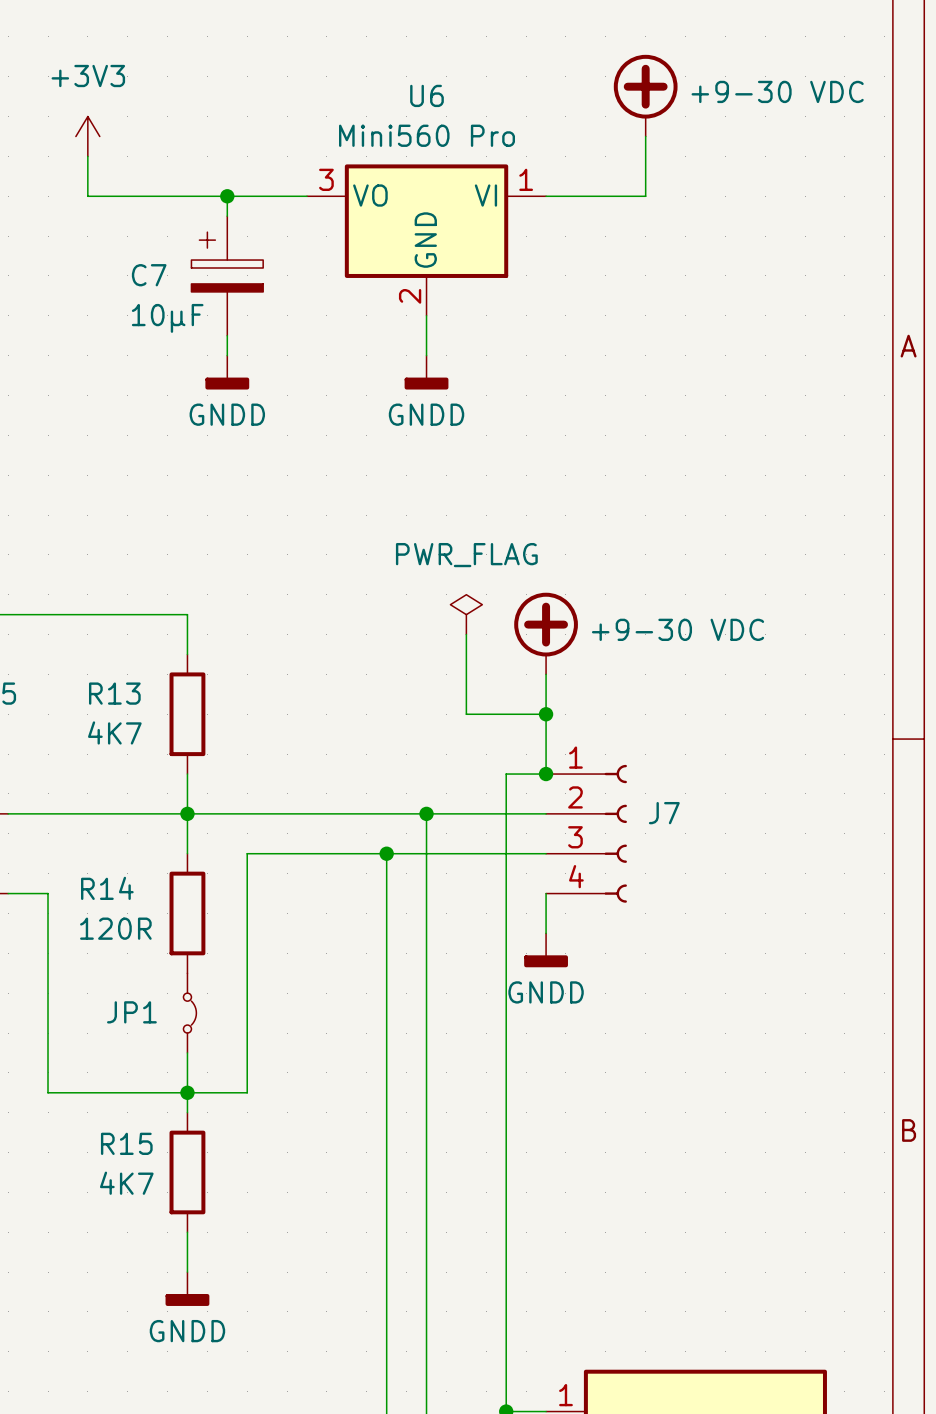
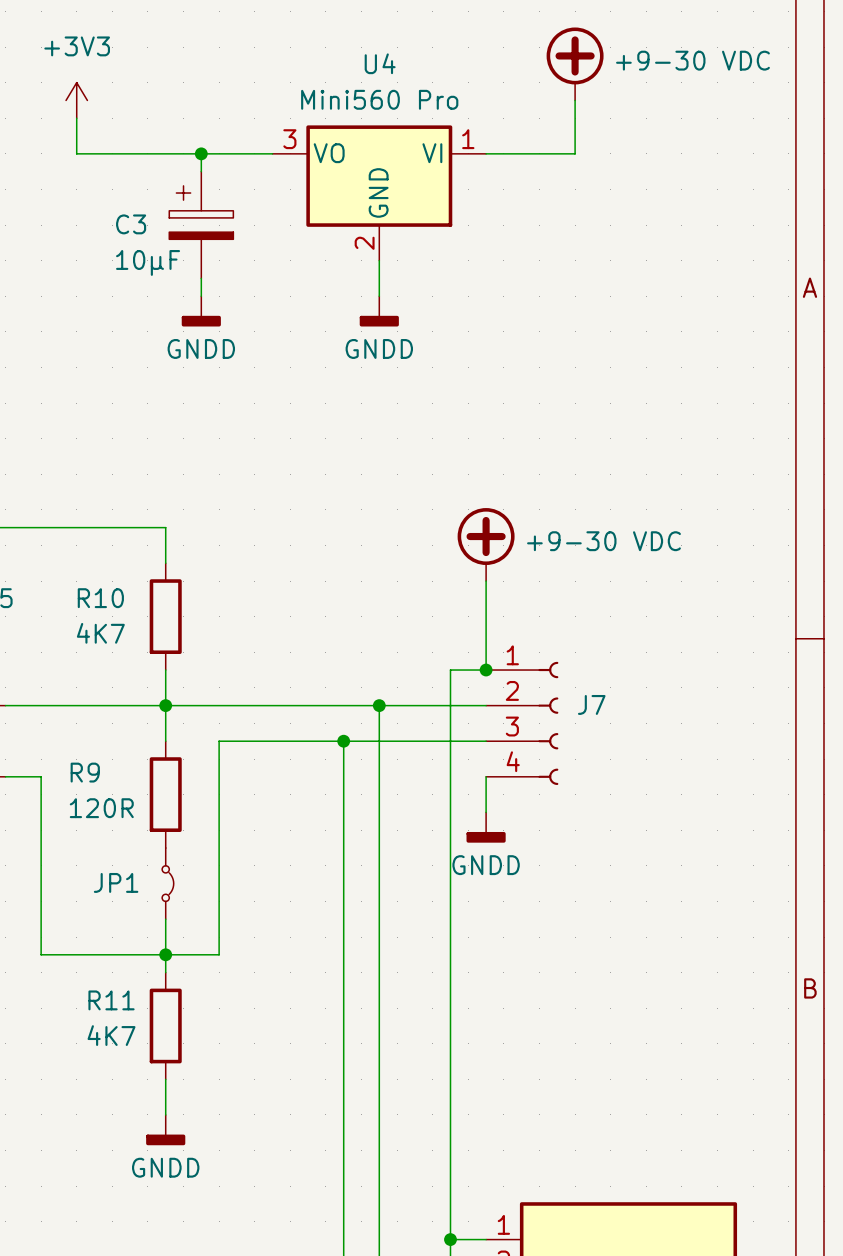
U6 name: U6 (427, 95) -> U4 (380, 63)
C7 name: C7 (149, 275) -> C3 (131, 224)
power symbol: PWR_FLAG (466, 614) -> none
wire: (466, 634) (466, 714) (546, 714) -> none
R13 name: R13 (114, 693) -> R10 (100, 598)
junction: (546, 714) -> none
R14 name: R14 (107, 888) -> R9 (85, 772)
R15 name: R15 (126, 1143) -> R11 (111, 1000)

